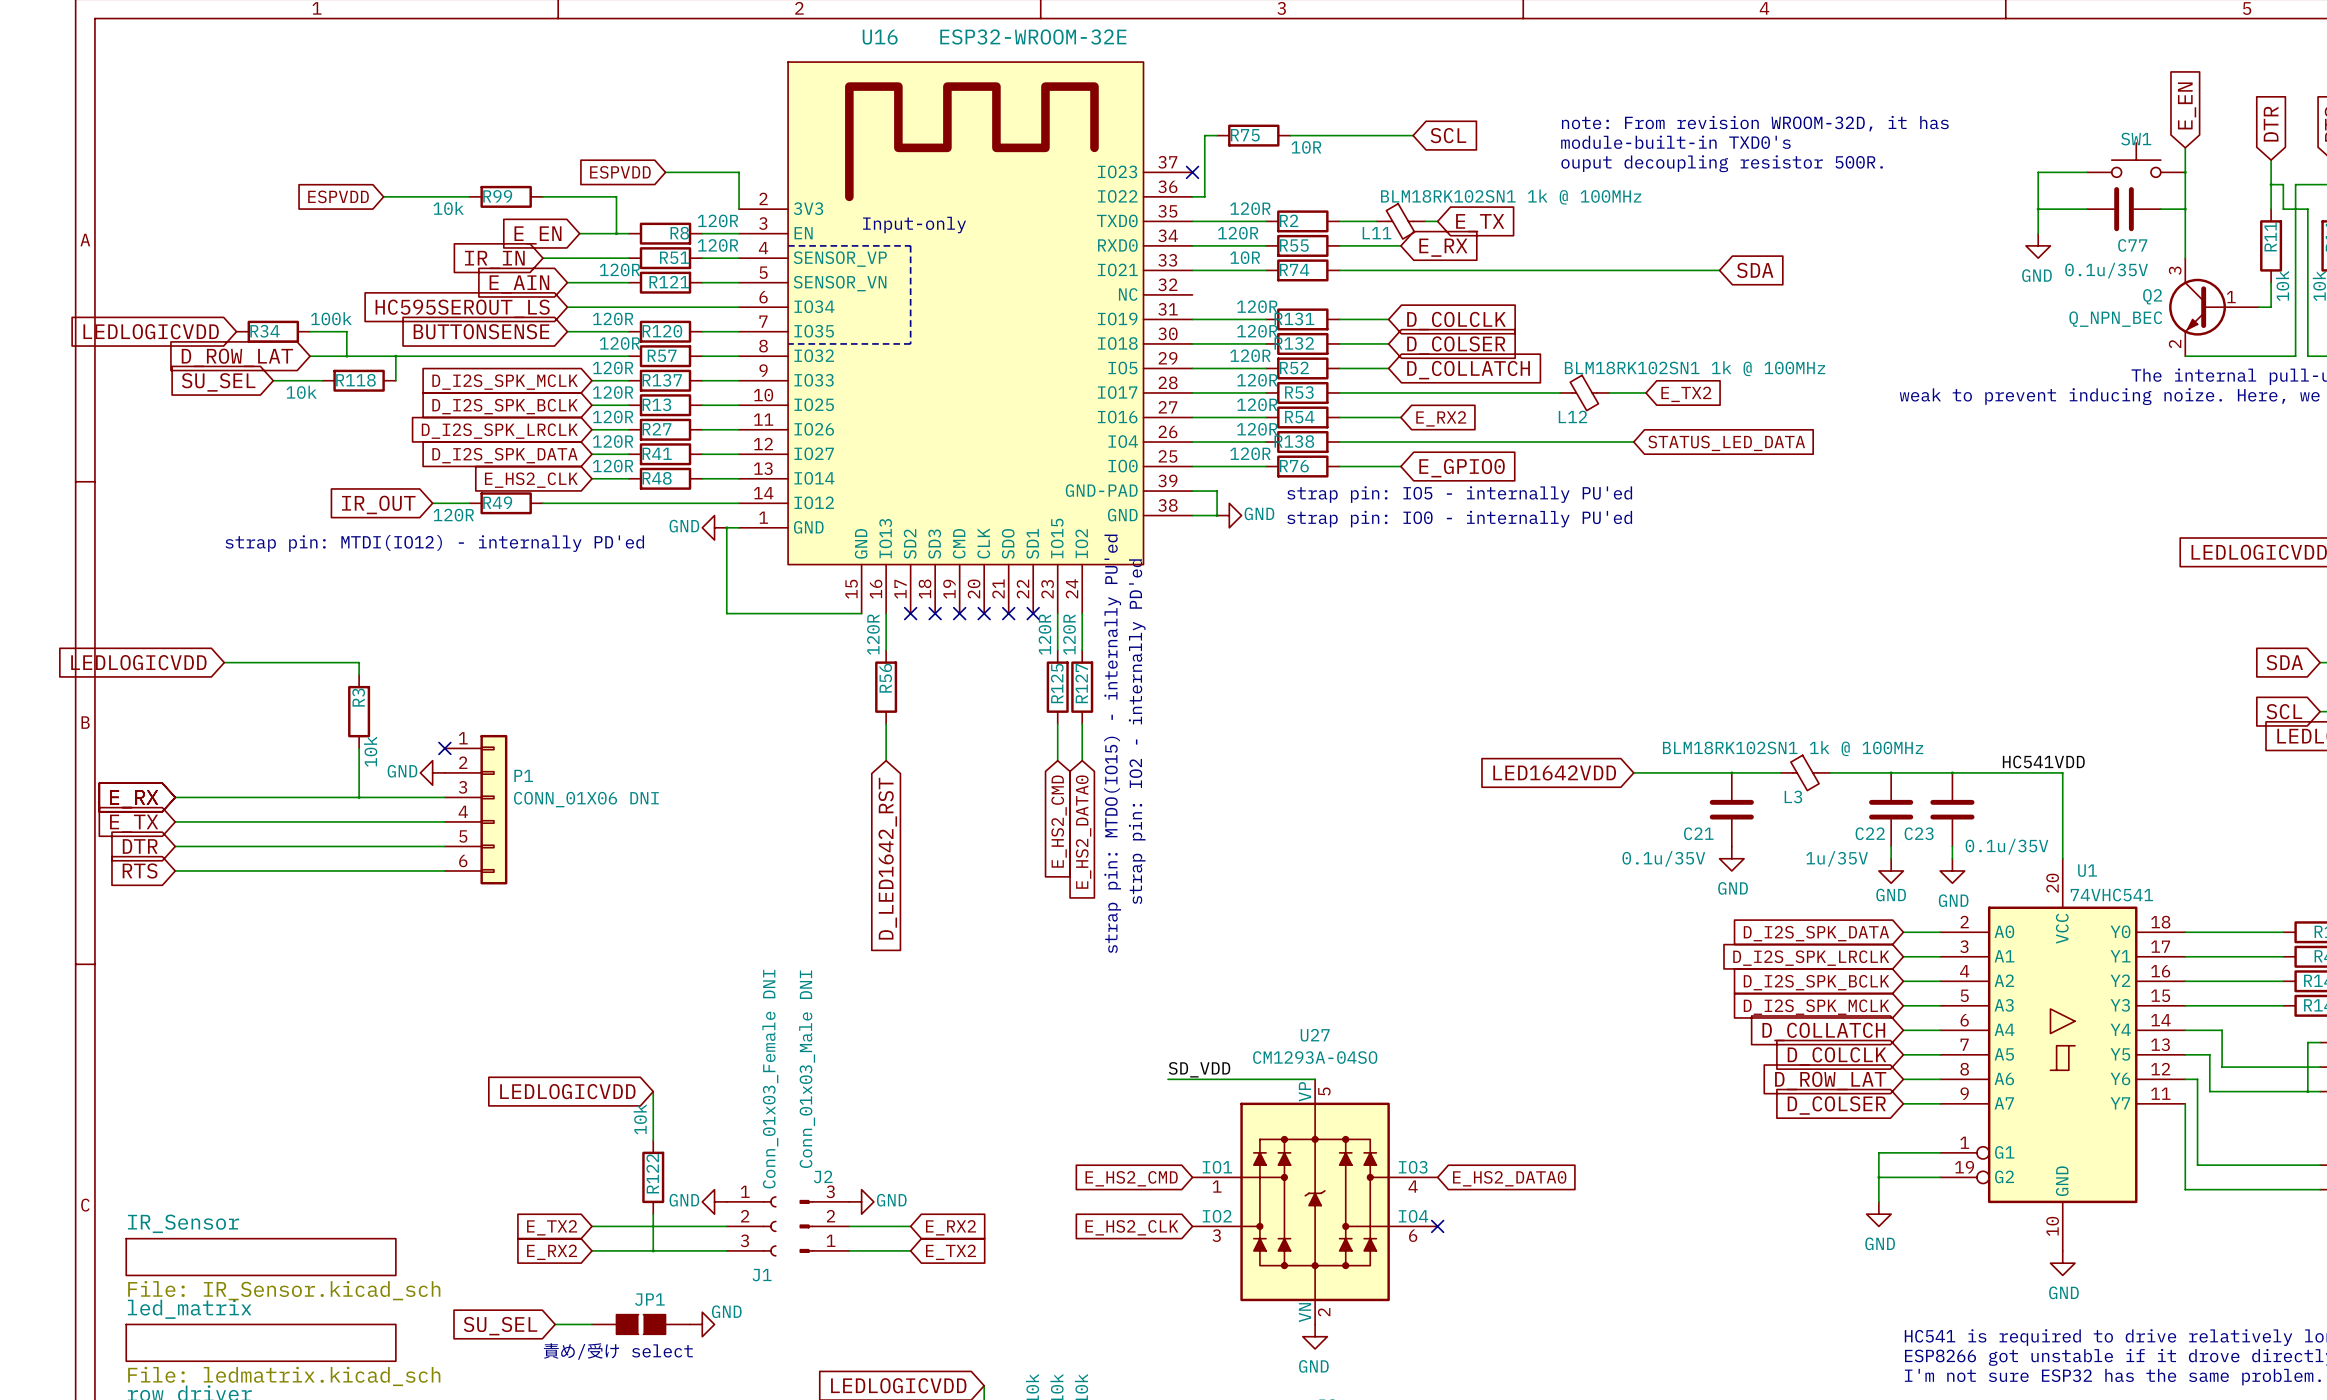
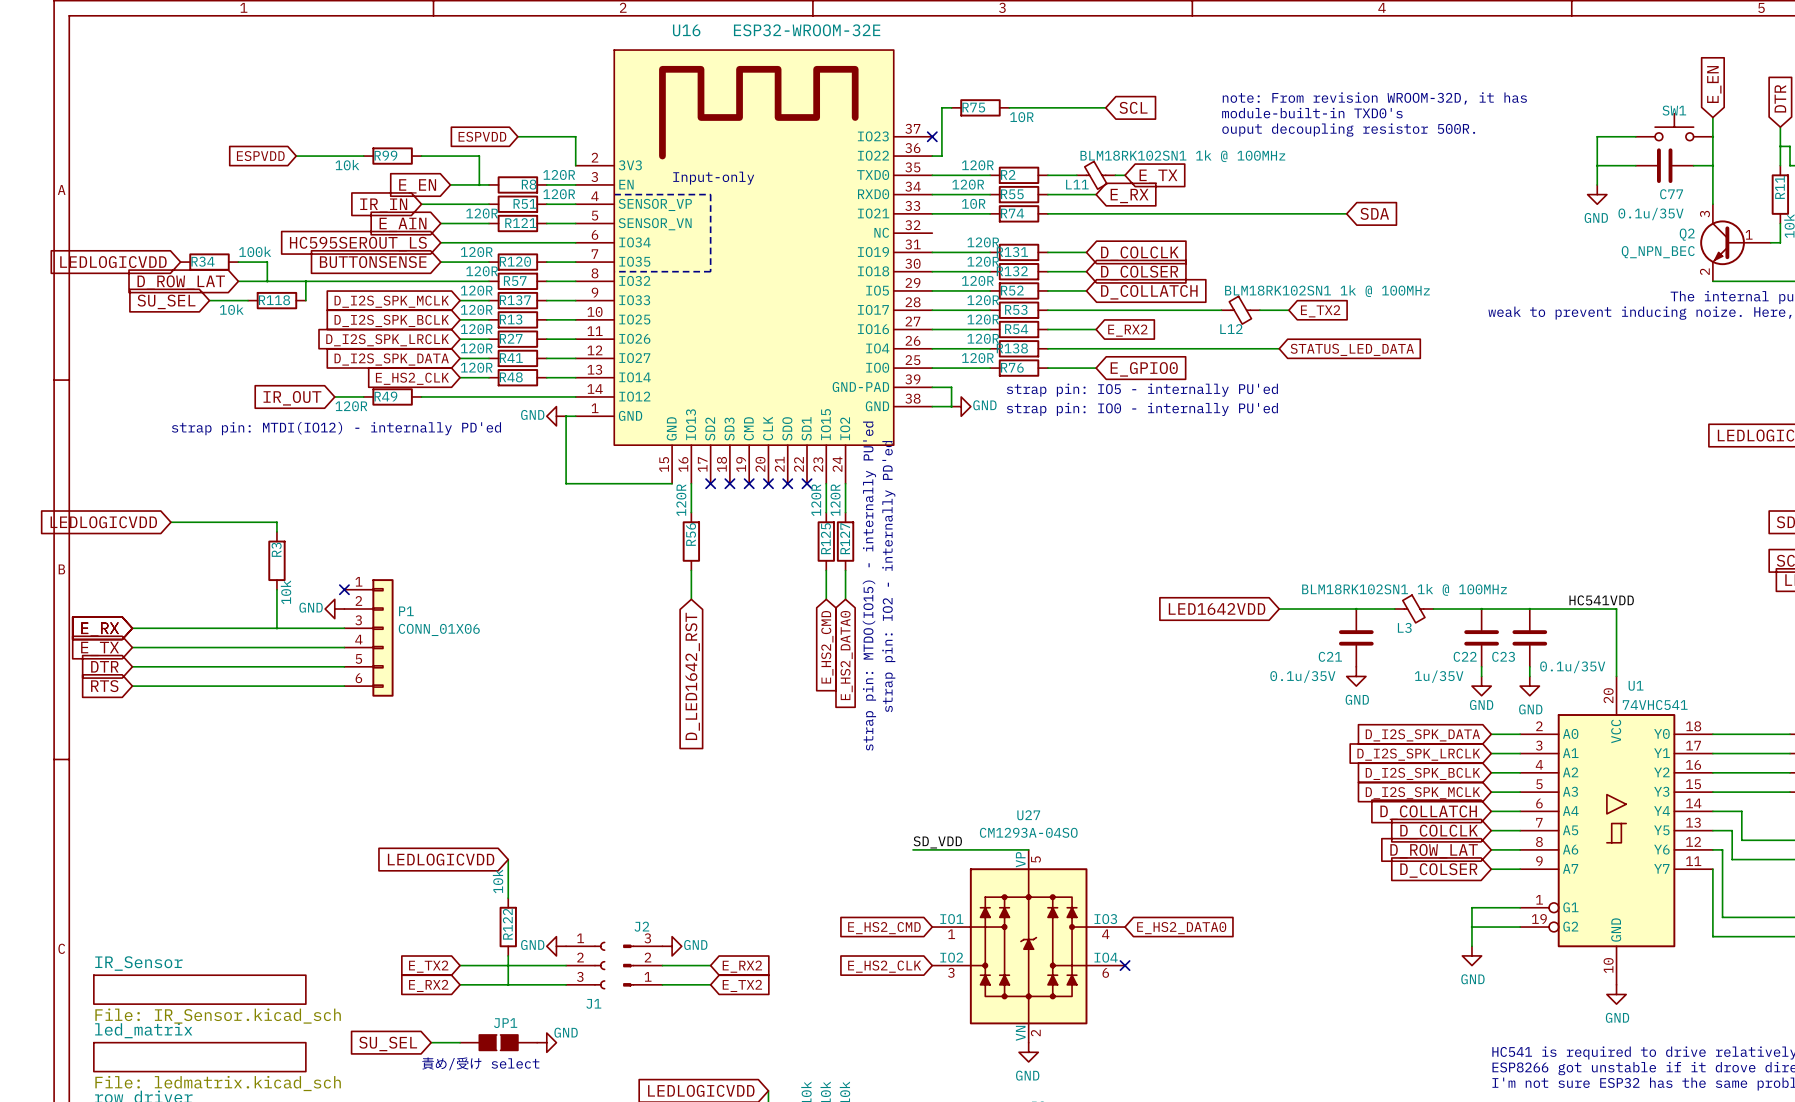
P1 value: CONN_01X06 DNI (586, 799) -> CONN_01X06 (439, 629)
J2 value: Conn_01x03_Male DNI (807, 1069) -> none
J1 value: Conn_01x03_Female DNI (770, 1079) -> none

